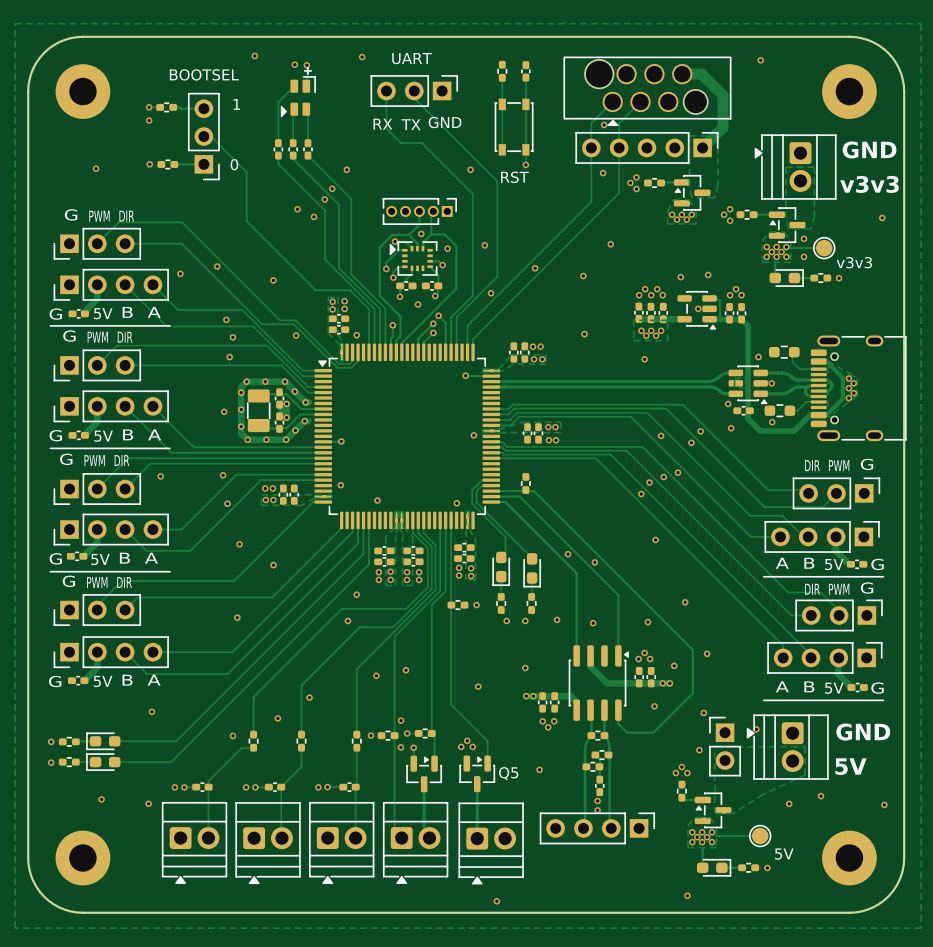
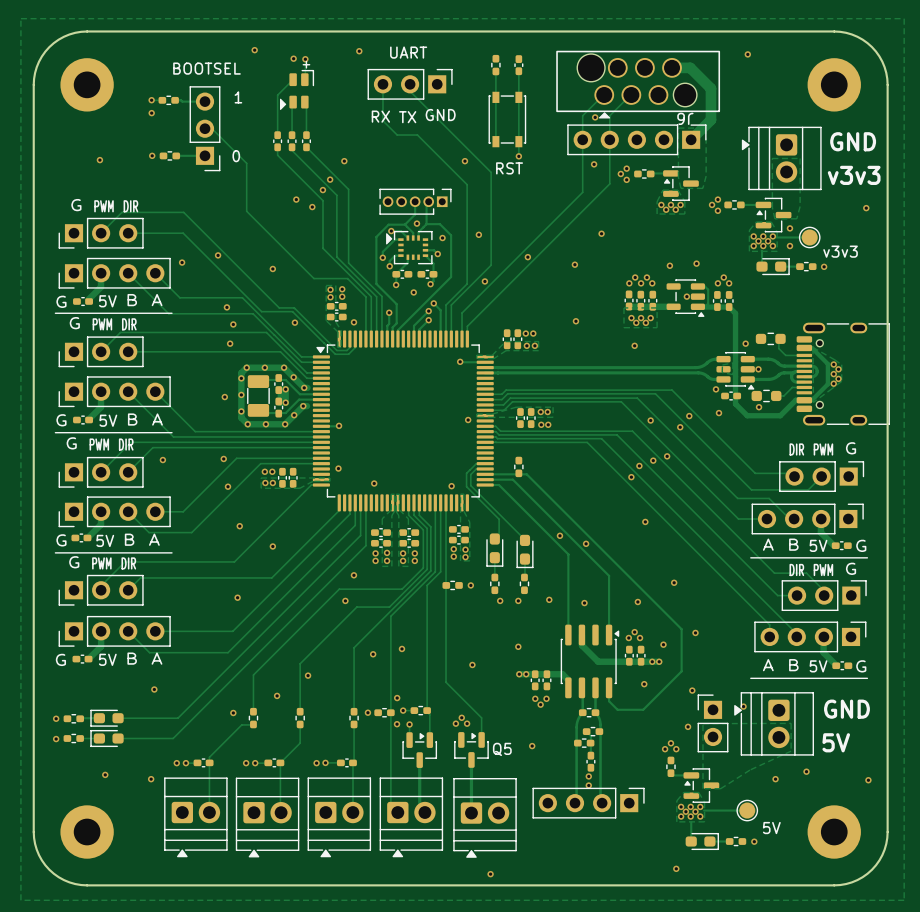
part: (647, 91) -> none
J6: none -> (638, 84)

